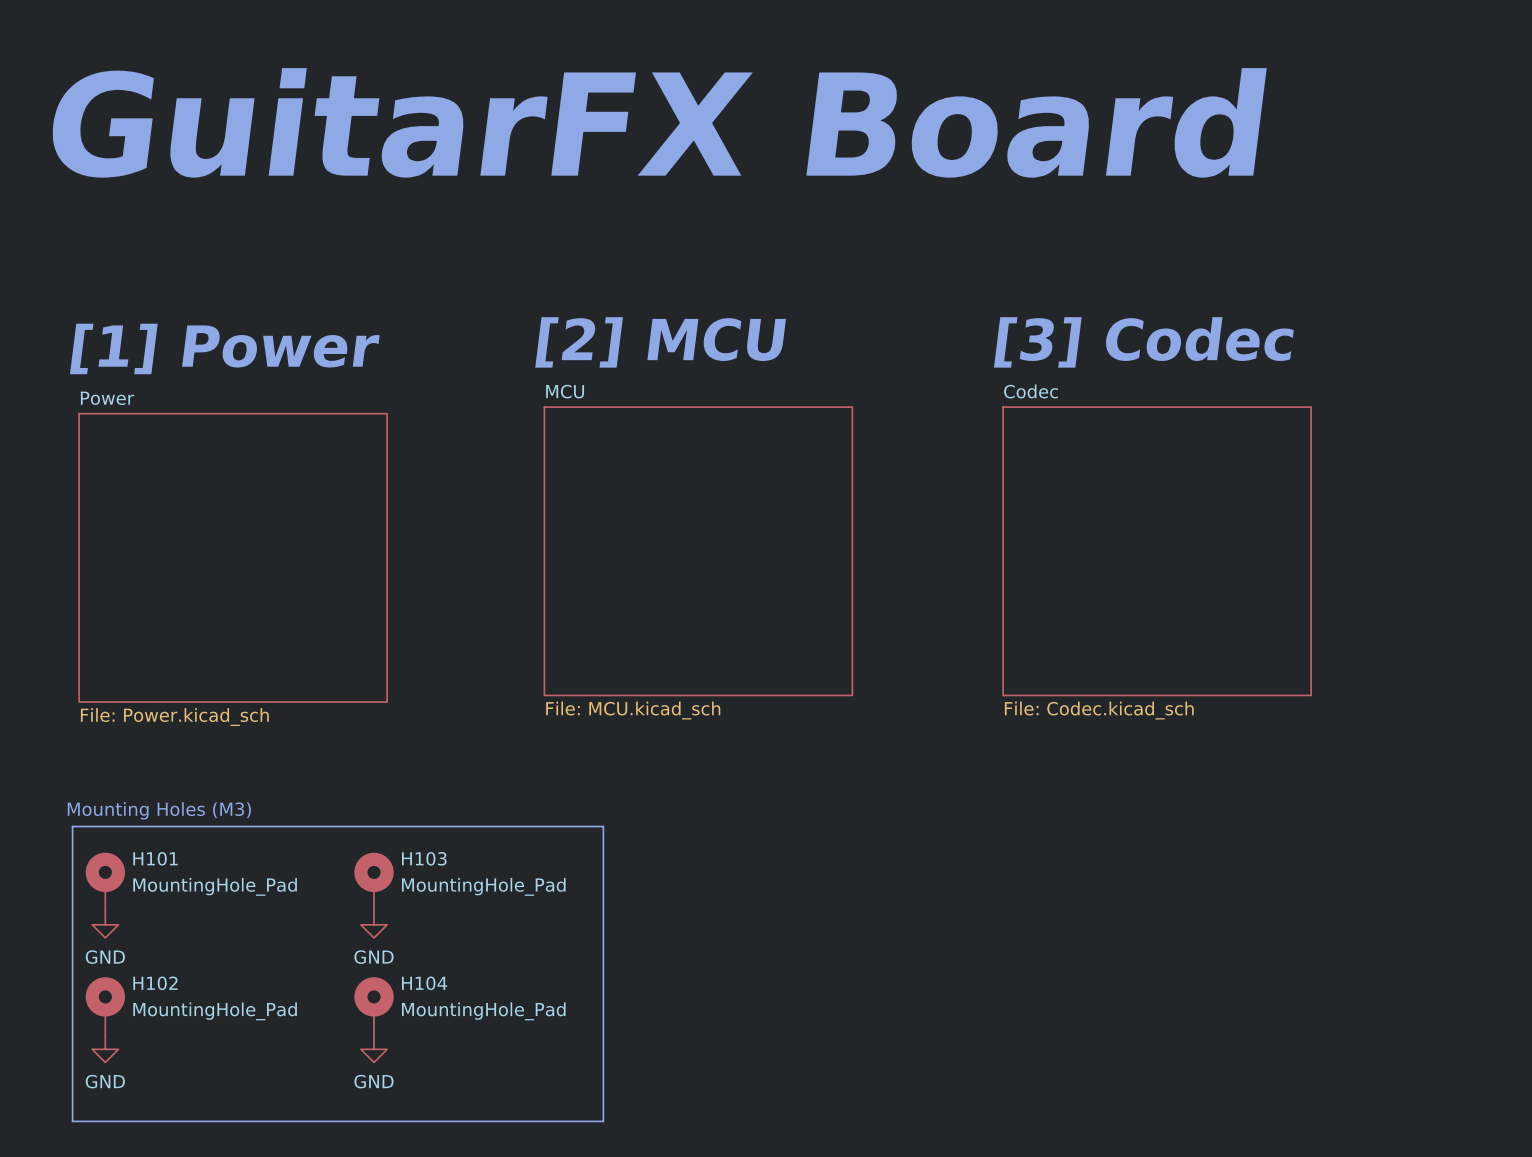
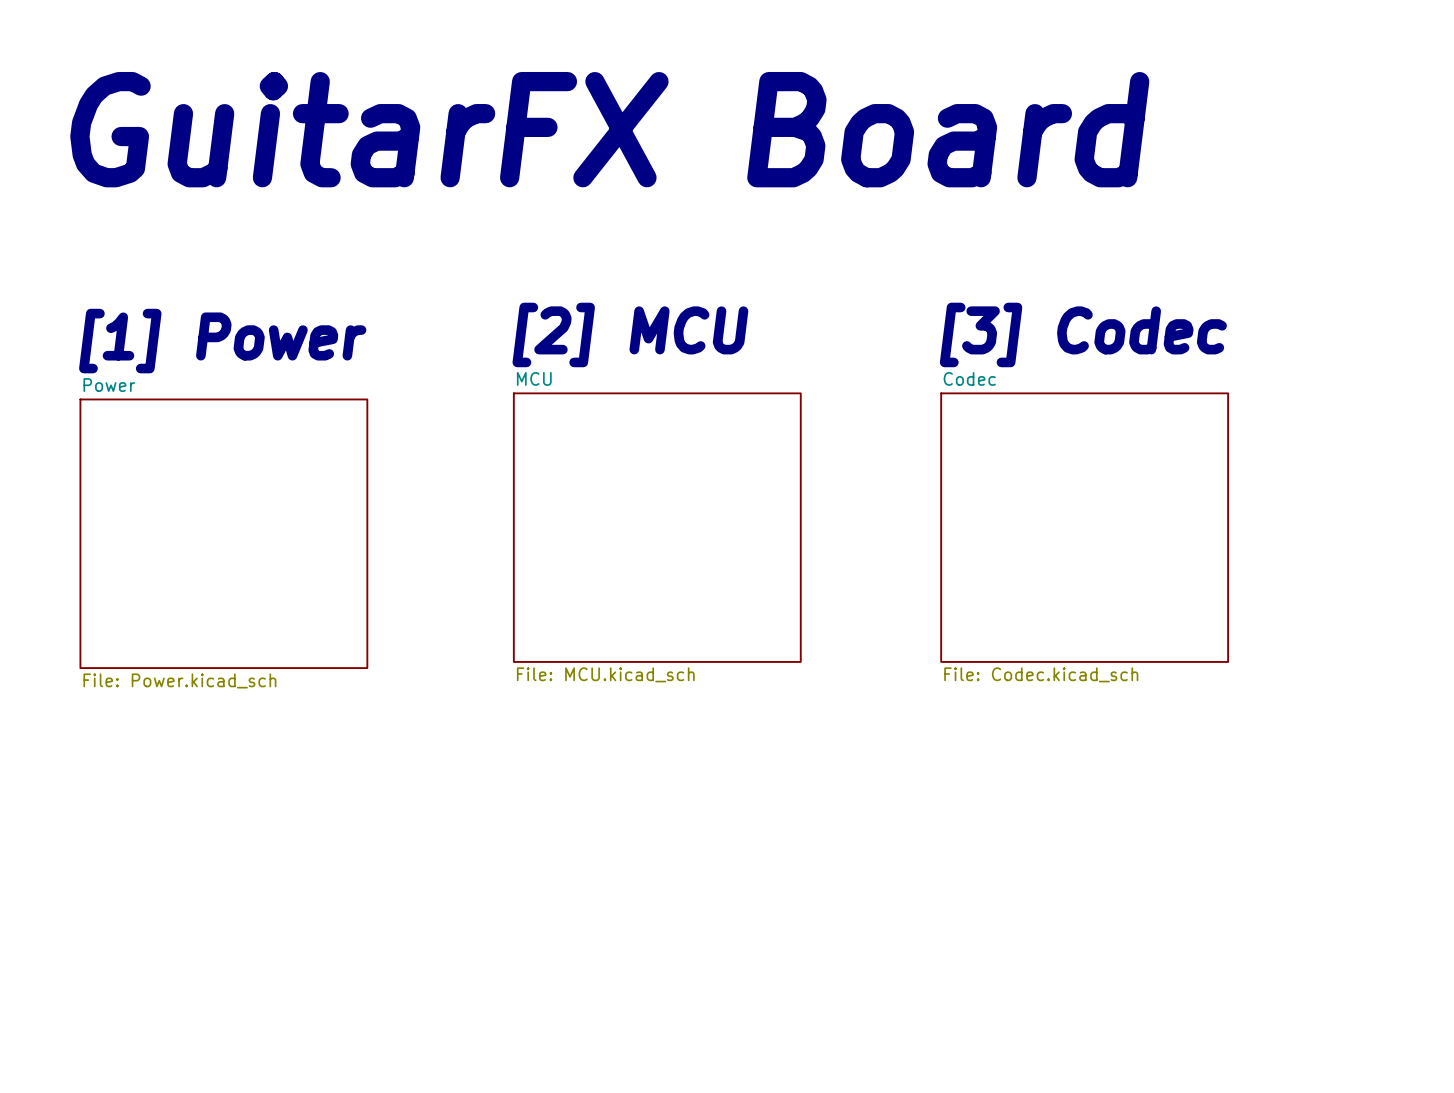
text: Mounting Holes (M3) (159, 810) -> none
line: (72, 826) (603, 826) (603, 1121) (72, 1121) (72, 826) -> none
H101: MountingHole_Pad (105, 882) -> none
H103: MountingHole_Pad (374, 882) -> none
power symbol: GND (105, 924) -> none
power symbol: GND (374, 924) -> none
H102: MountingHole_Pad (105, 1006) -> none
H104: MountingHole_Pad (374, 1006) -> none
power symbol: GND (105, 1049) -> none
power symbol: GND (374, 1049) -> none

